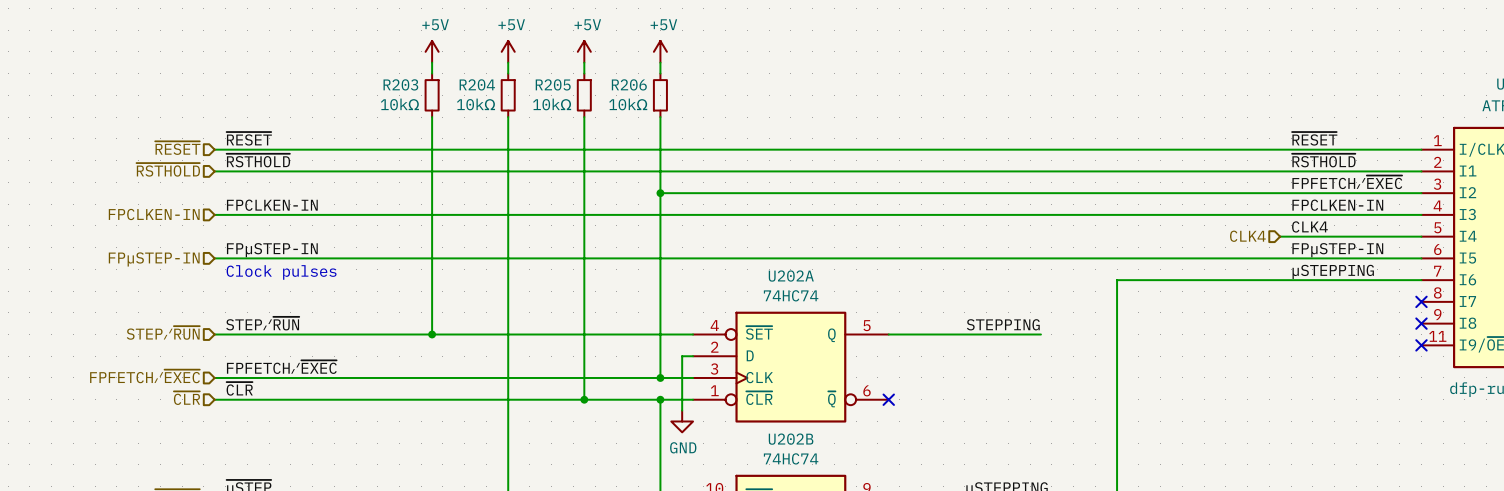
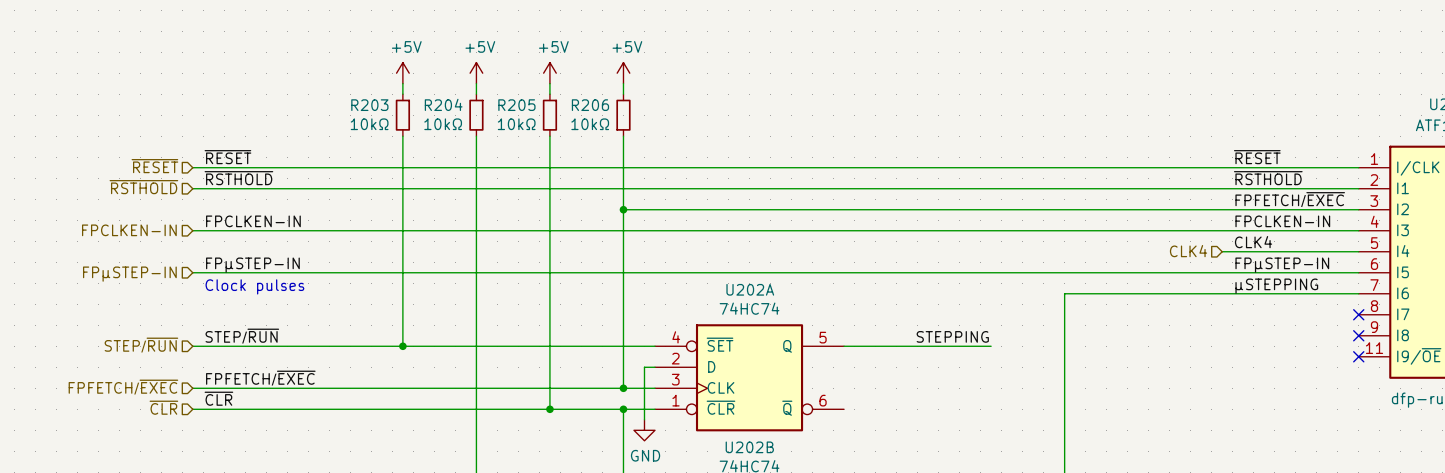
no-connect mark: (888, 399) -> none

